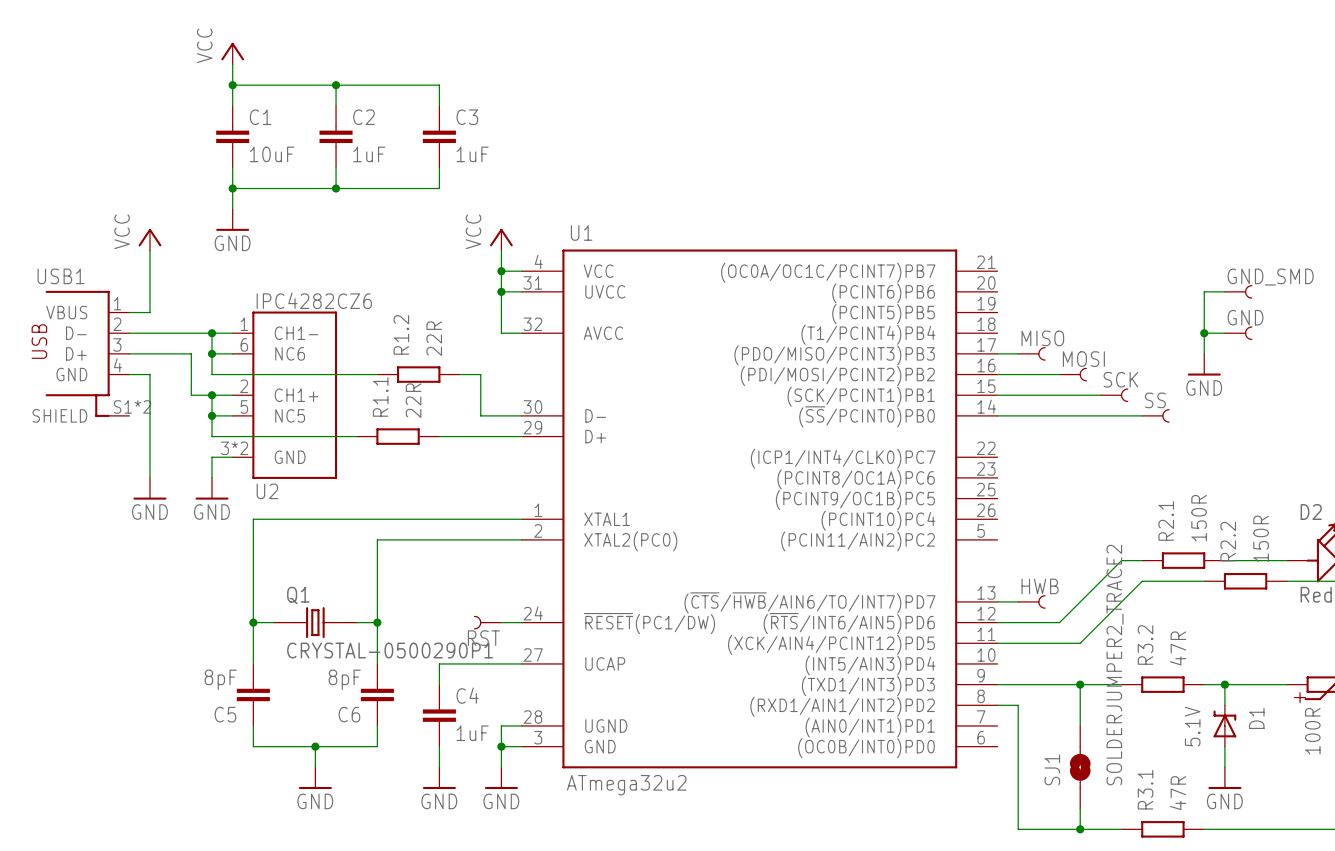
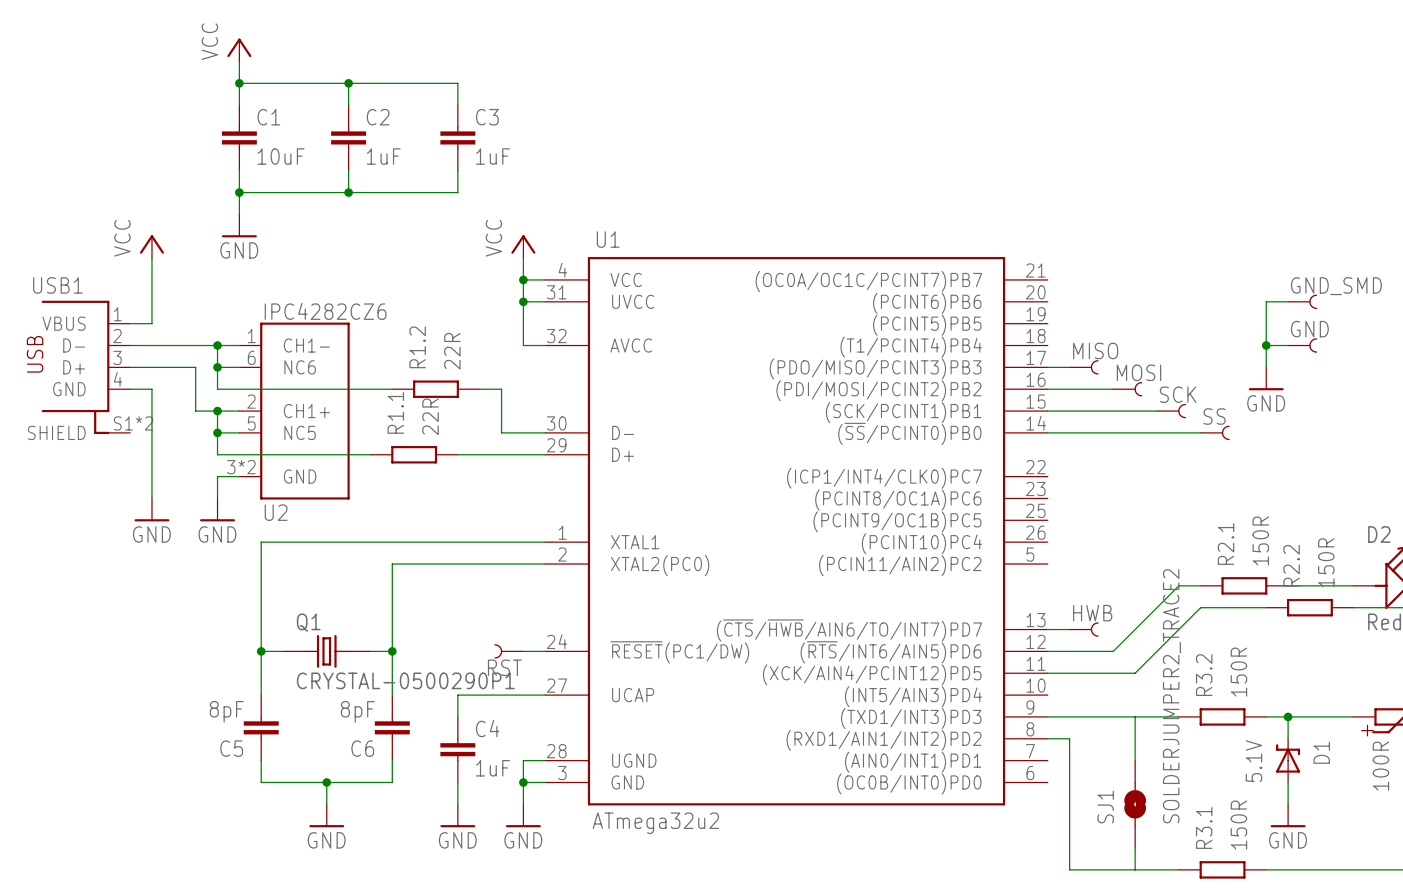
R3.2 value: 47R (1178, 648) -> 150R (1238, 672)
junction: (1080, 684) -> none
R3.1 value: 47R (1178, 793) -> 150R (1238, 825)
junction: (1080, 829) -> none

